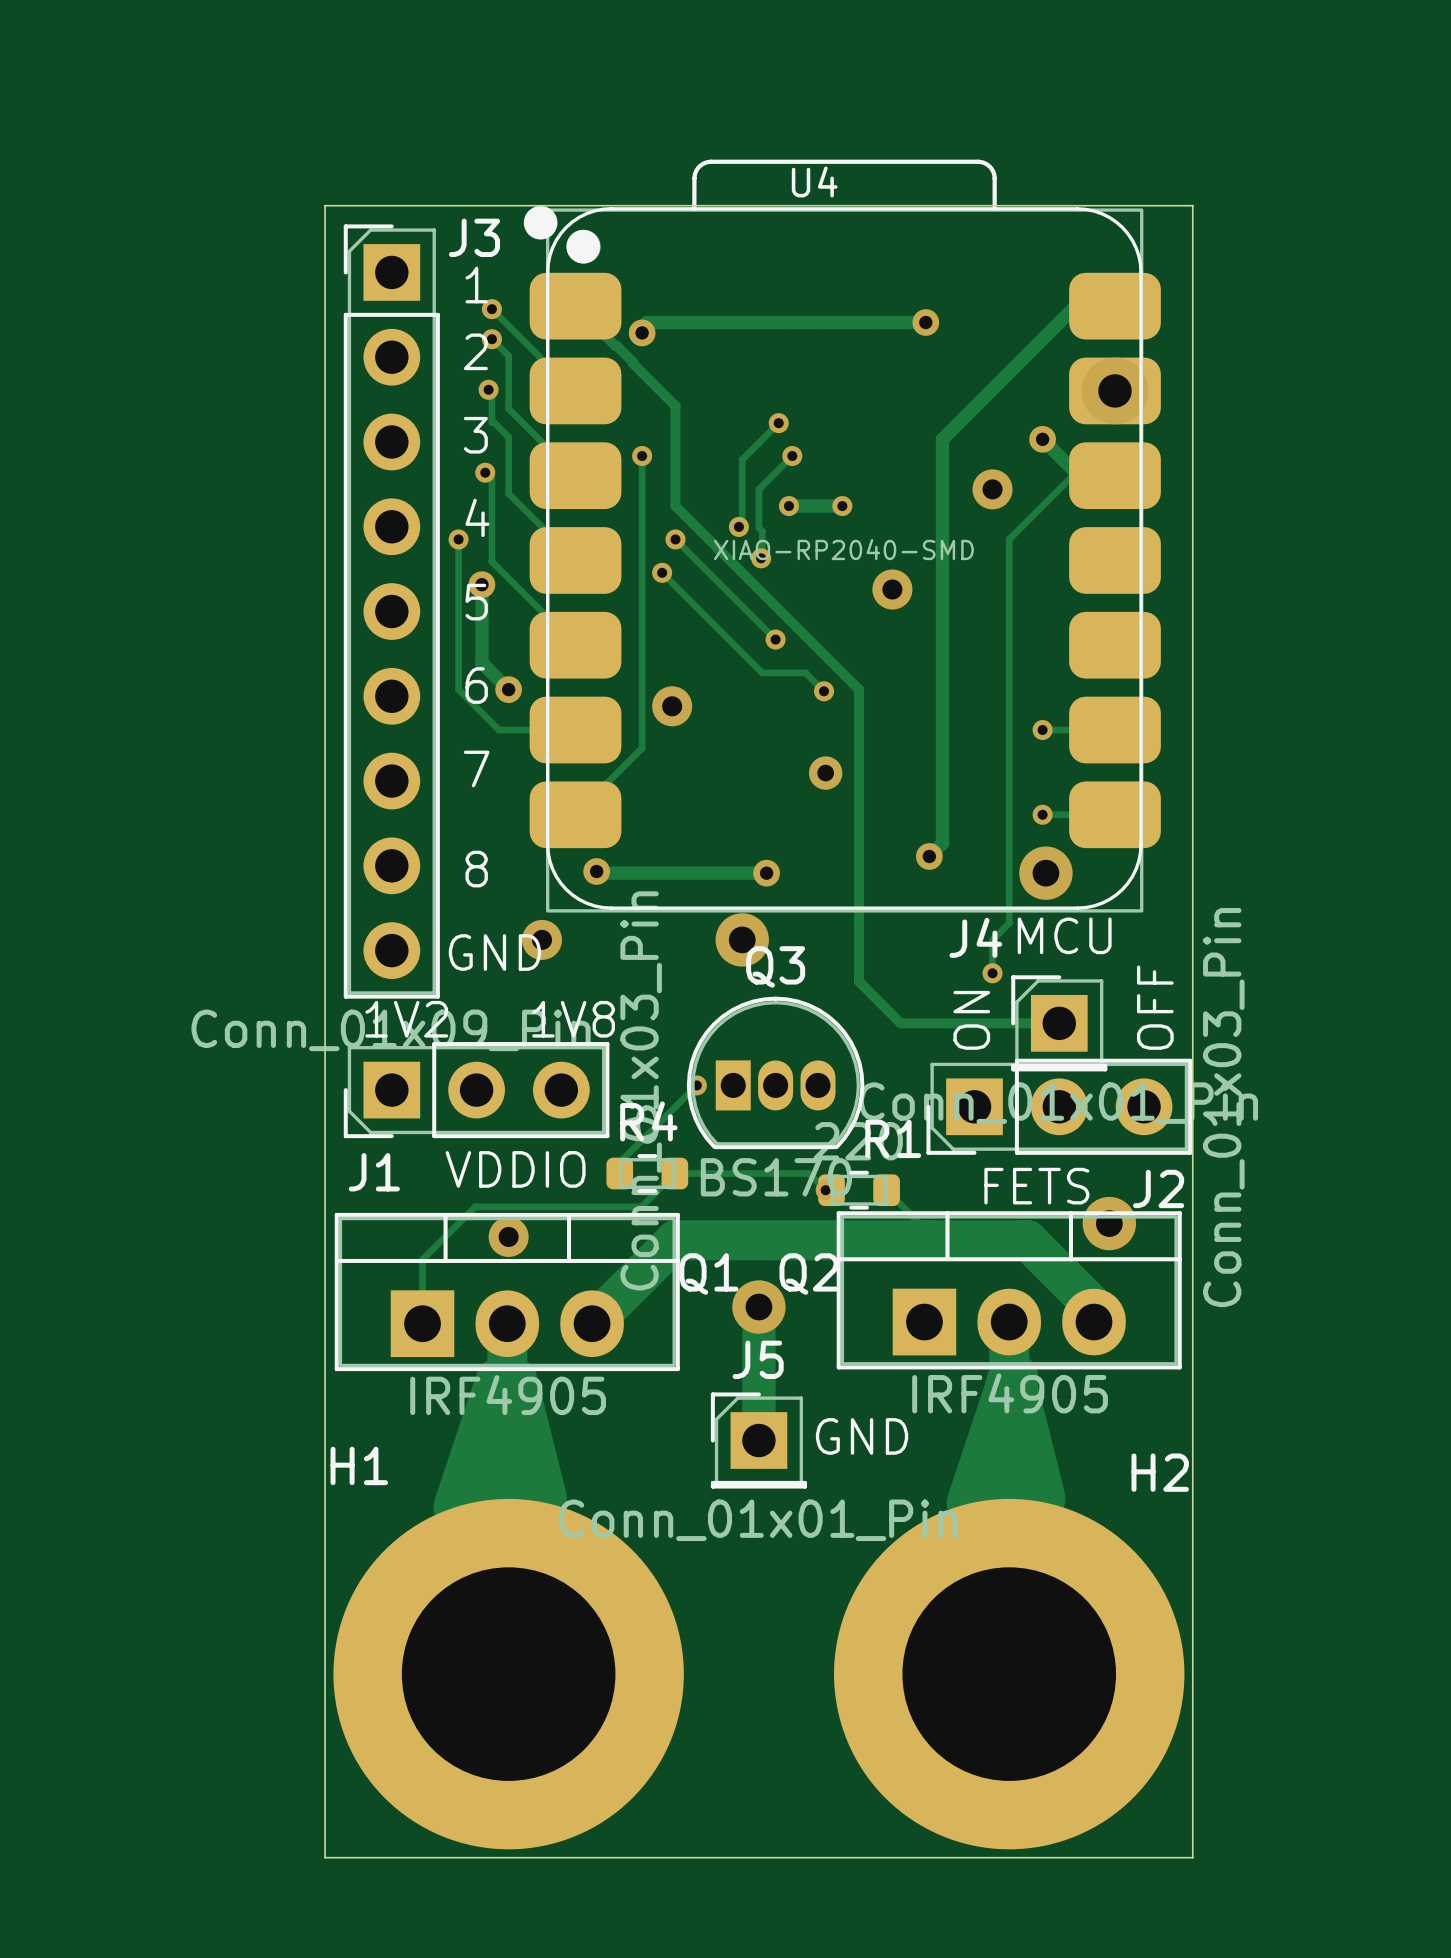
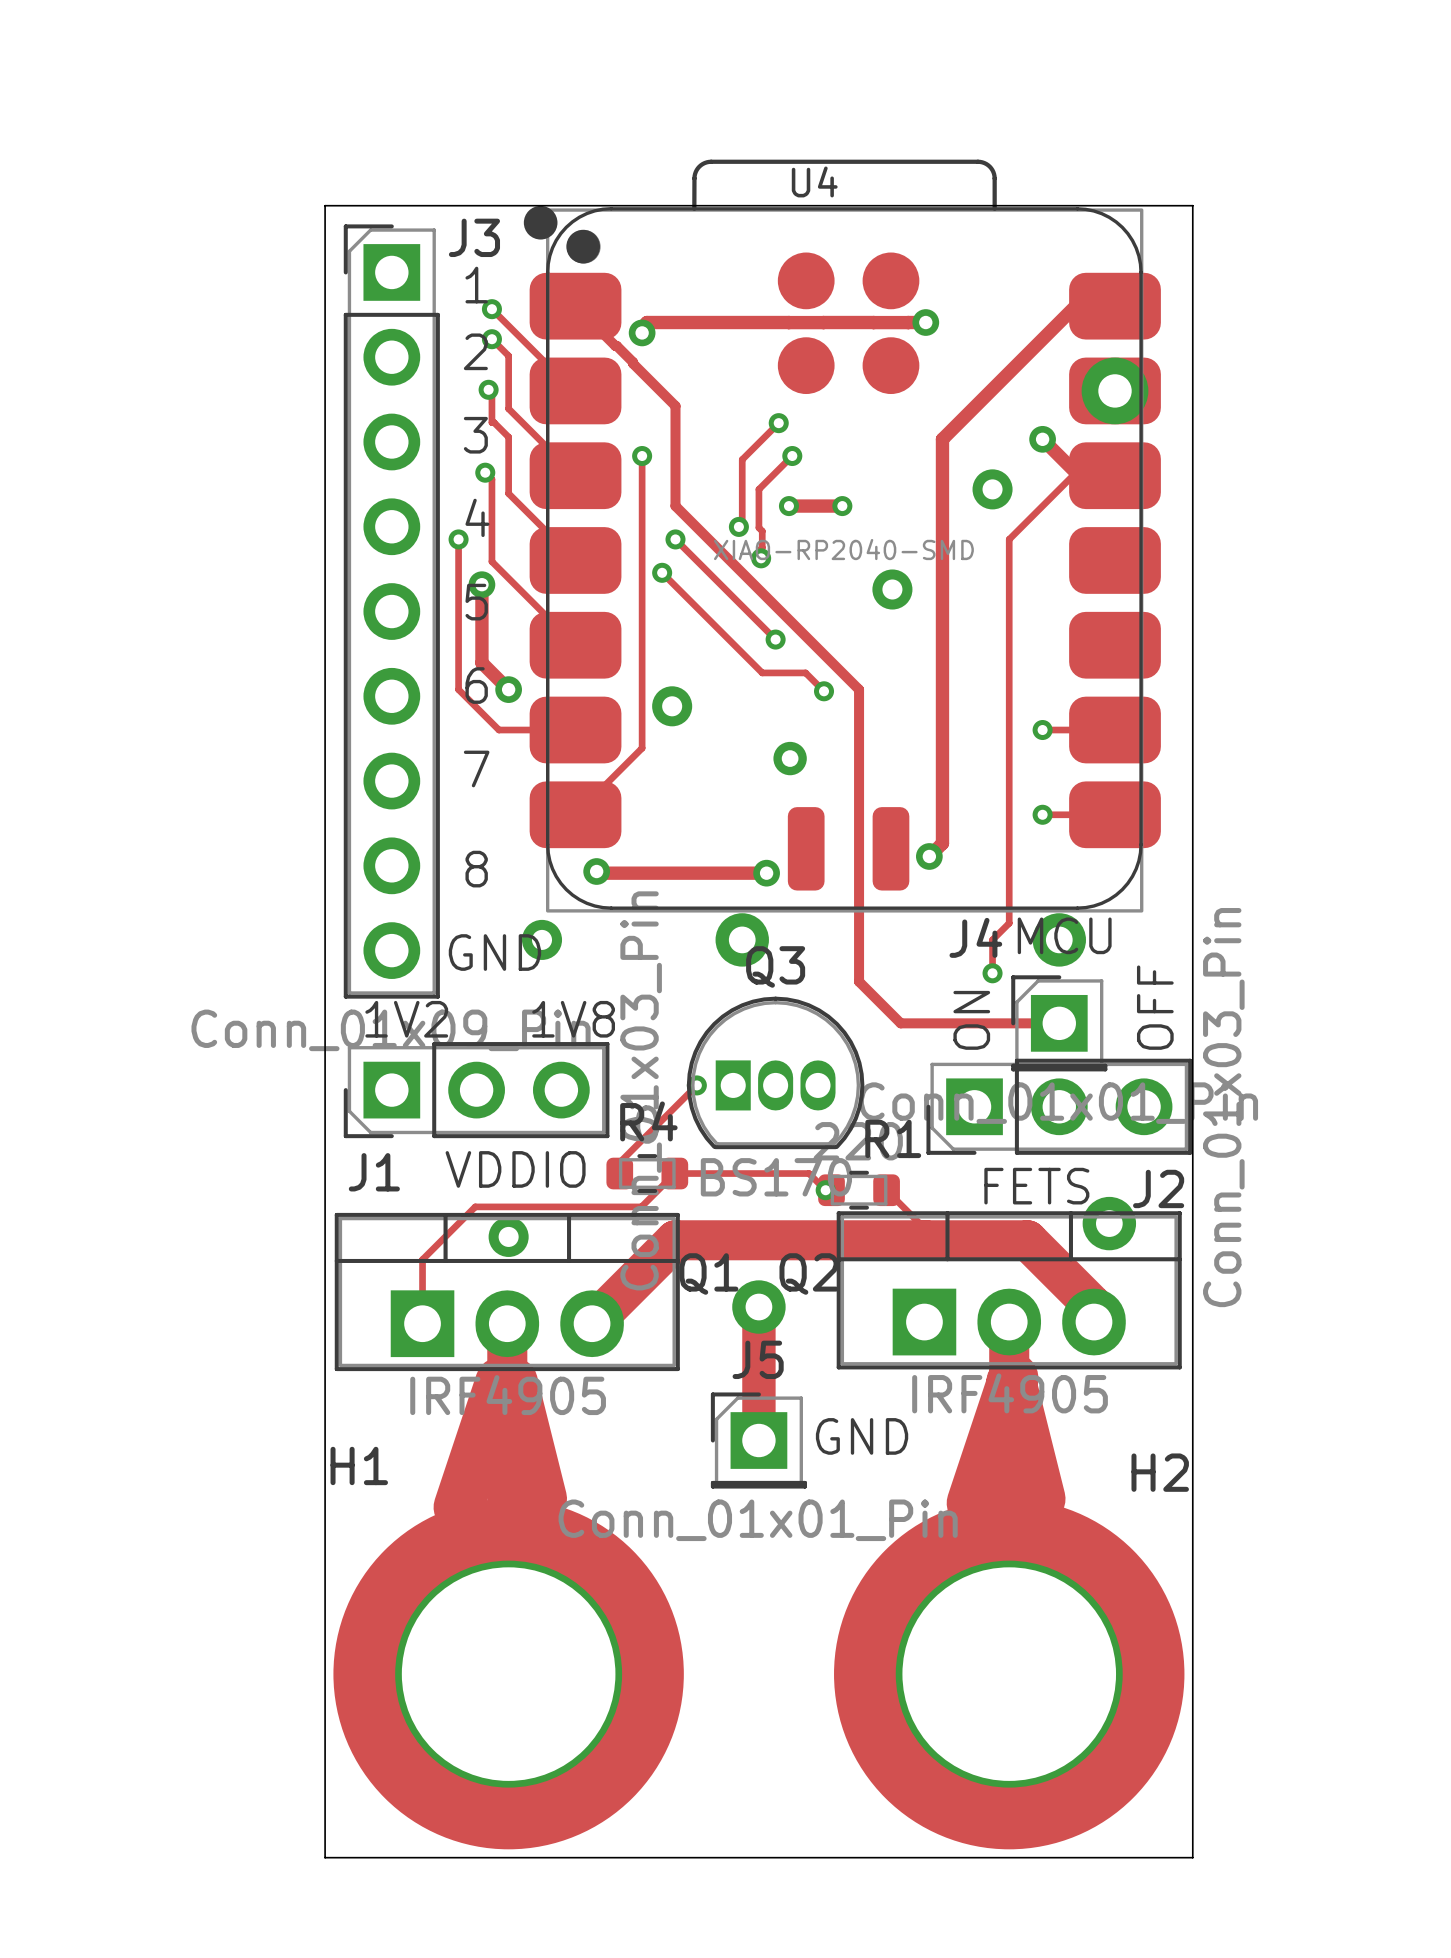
U4 footprint: [523, 159, 1161, 913] -> [523, 159, 1161, 913]
via position: (825, 773) -> (790, 758)
via position: (1045, 873) -> (1059, 939)

